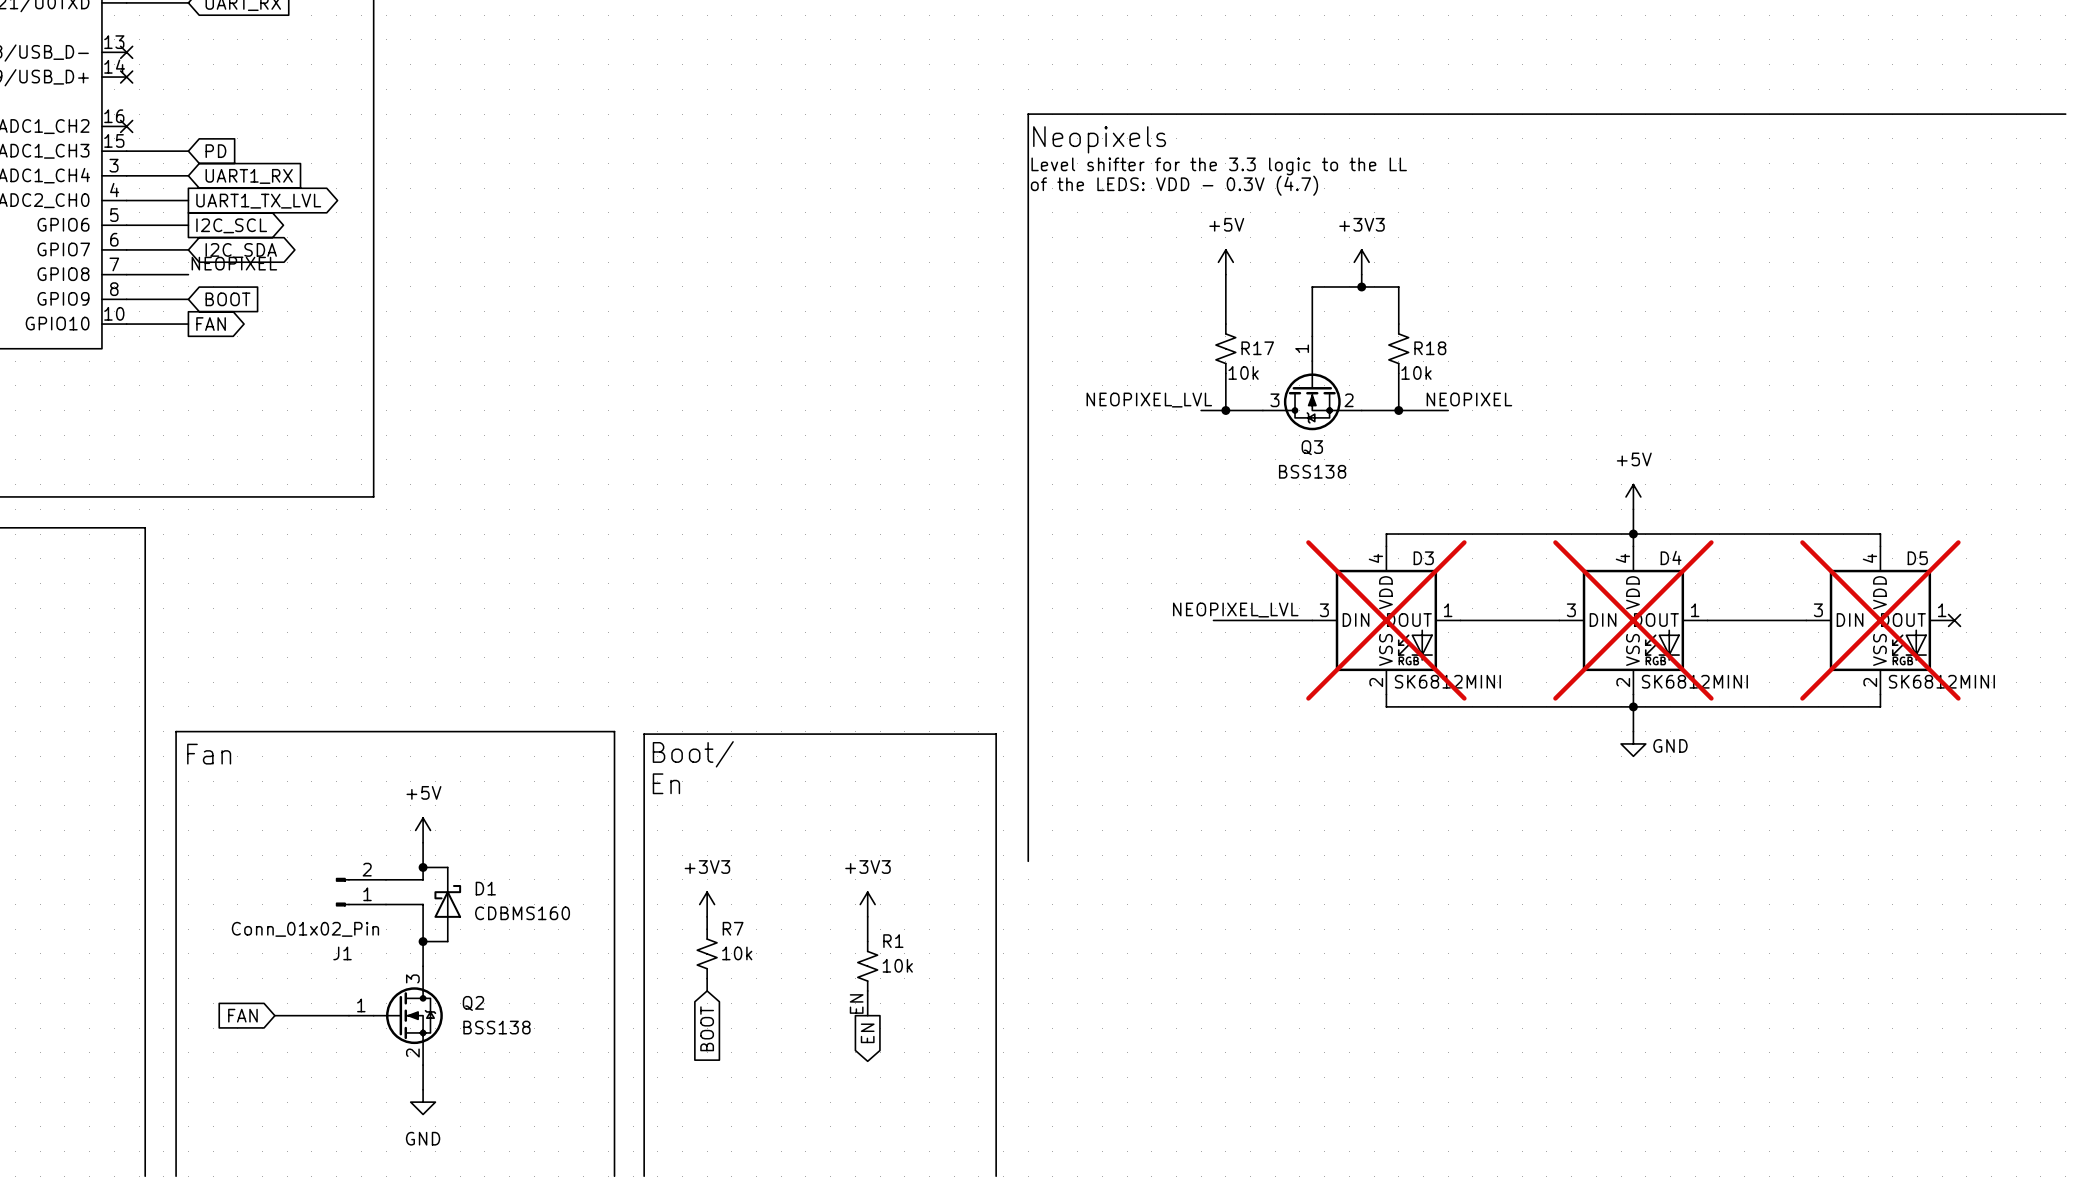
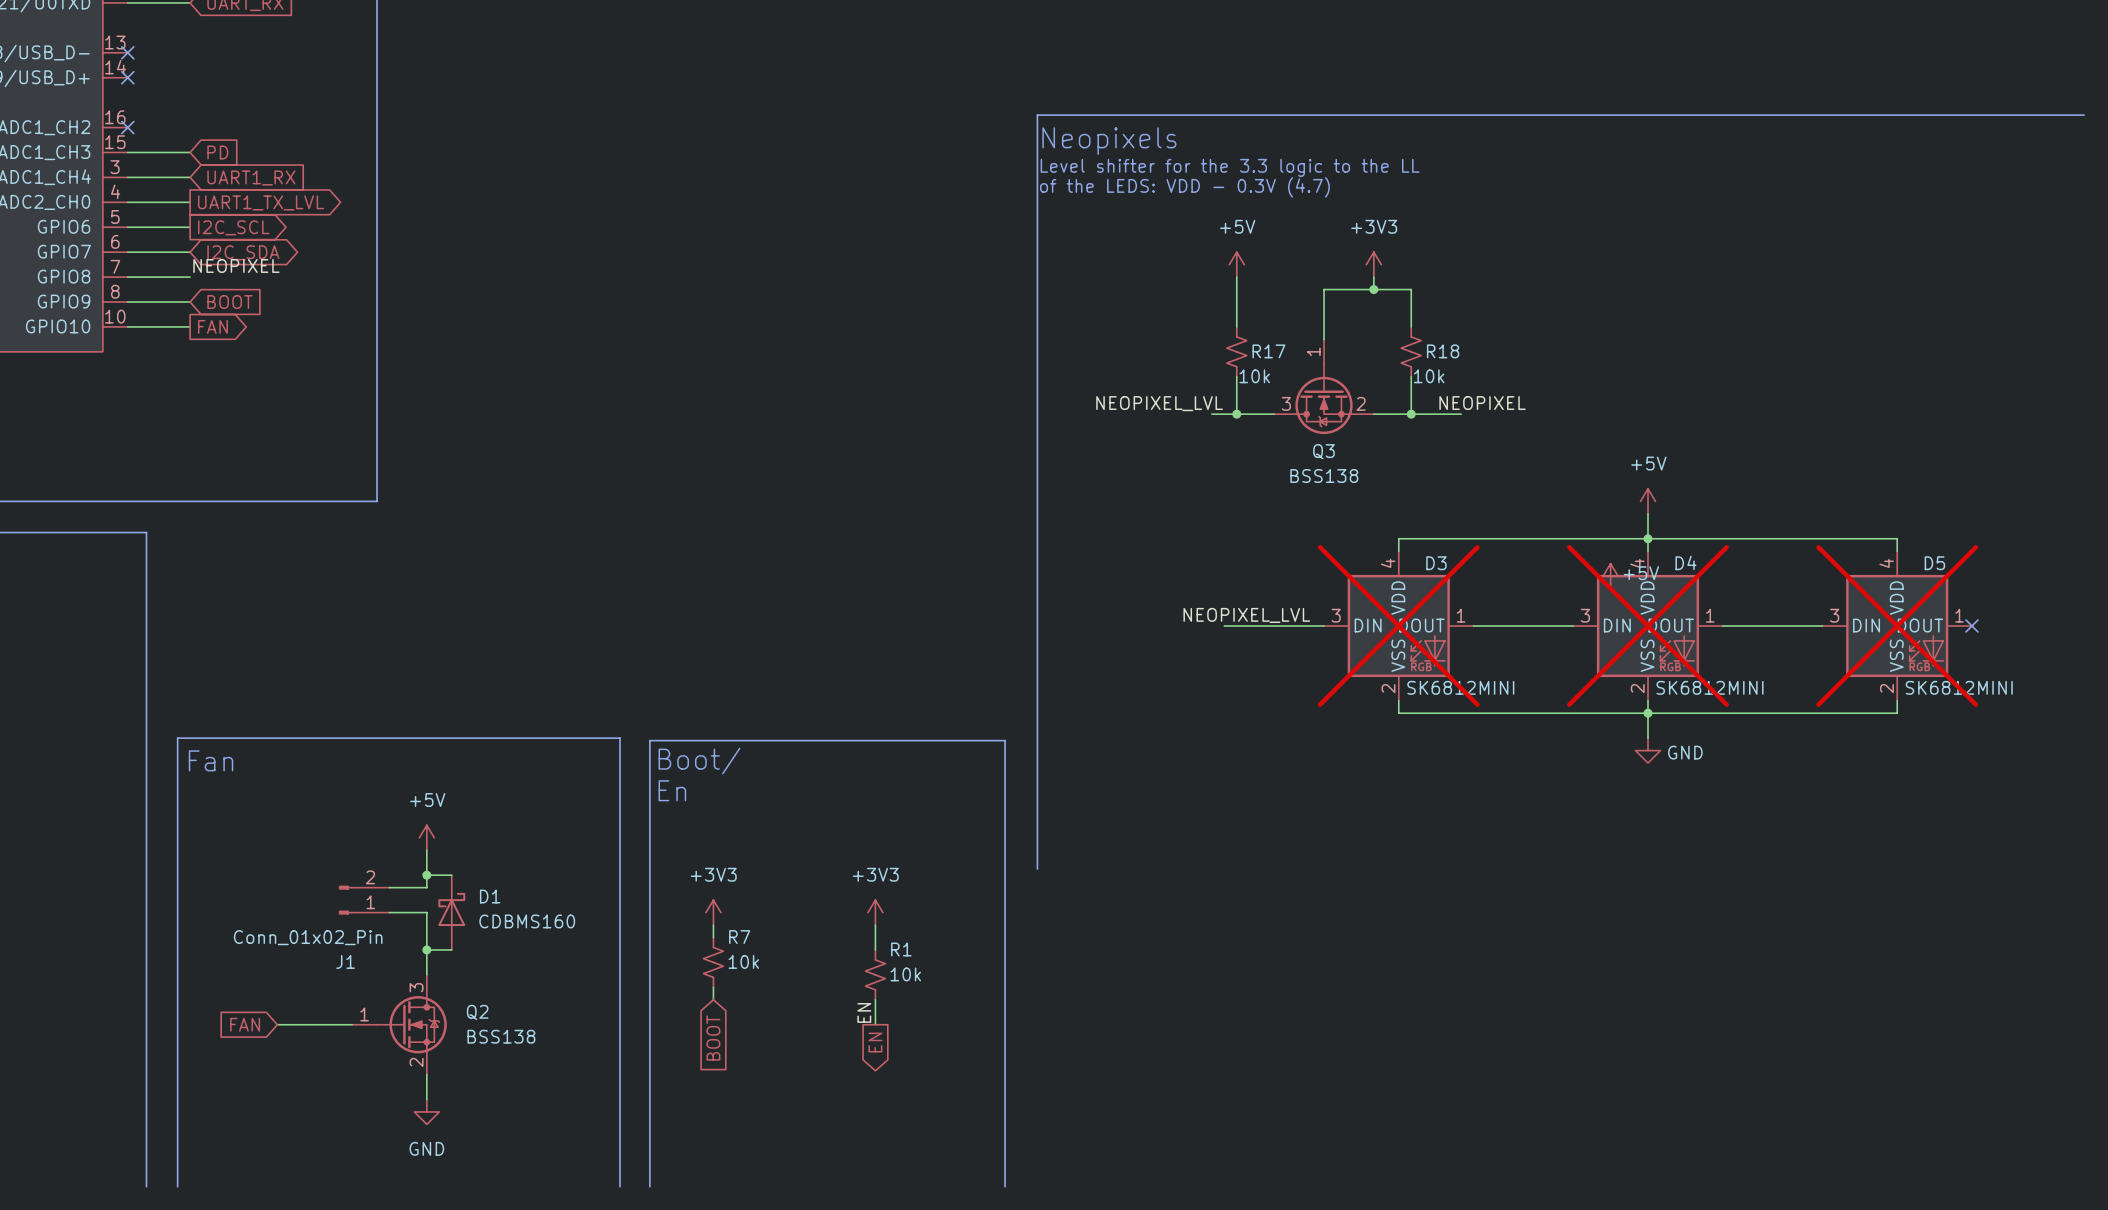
power symbol: none -> +5V (1610, 576)

